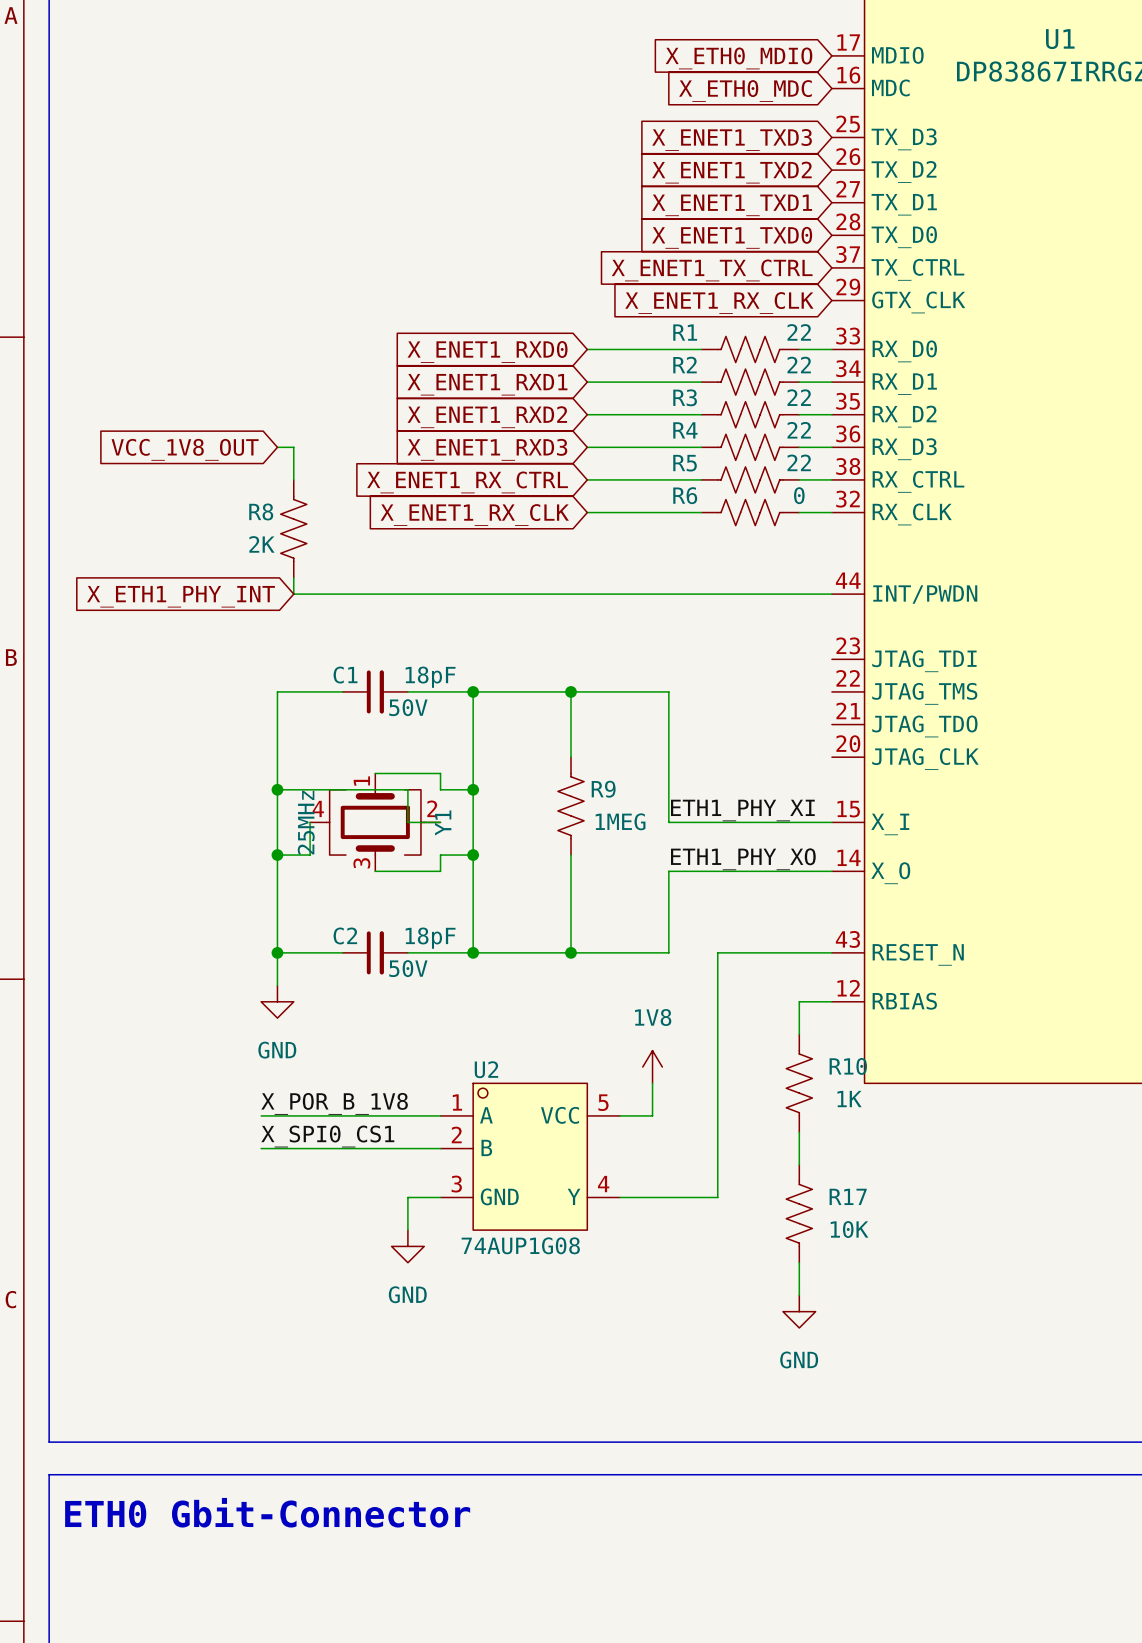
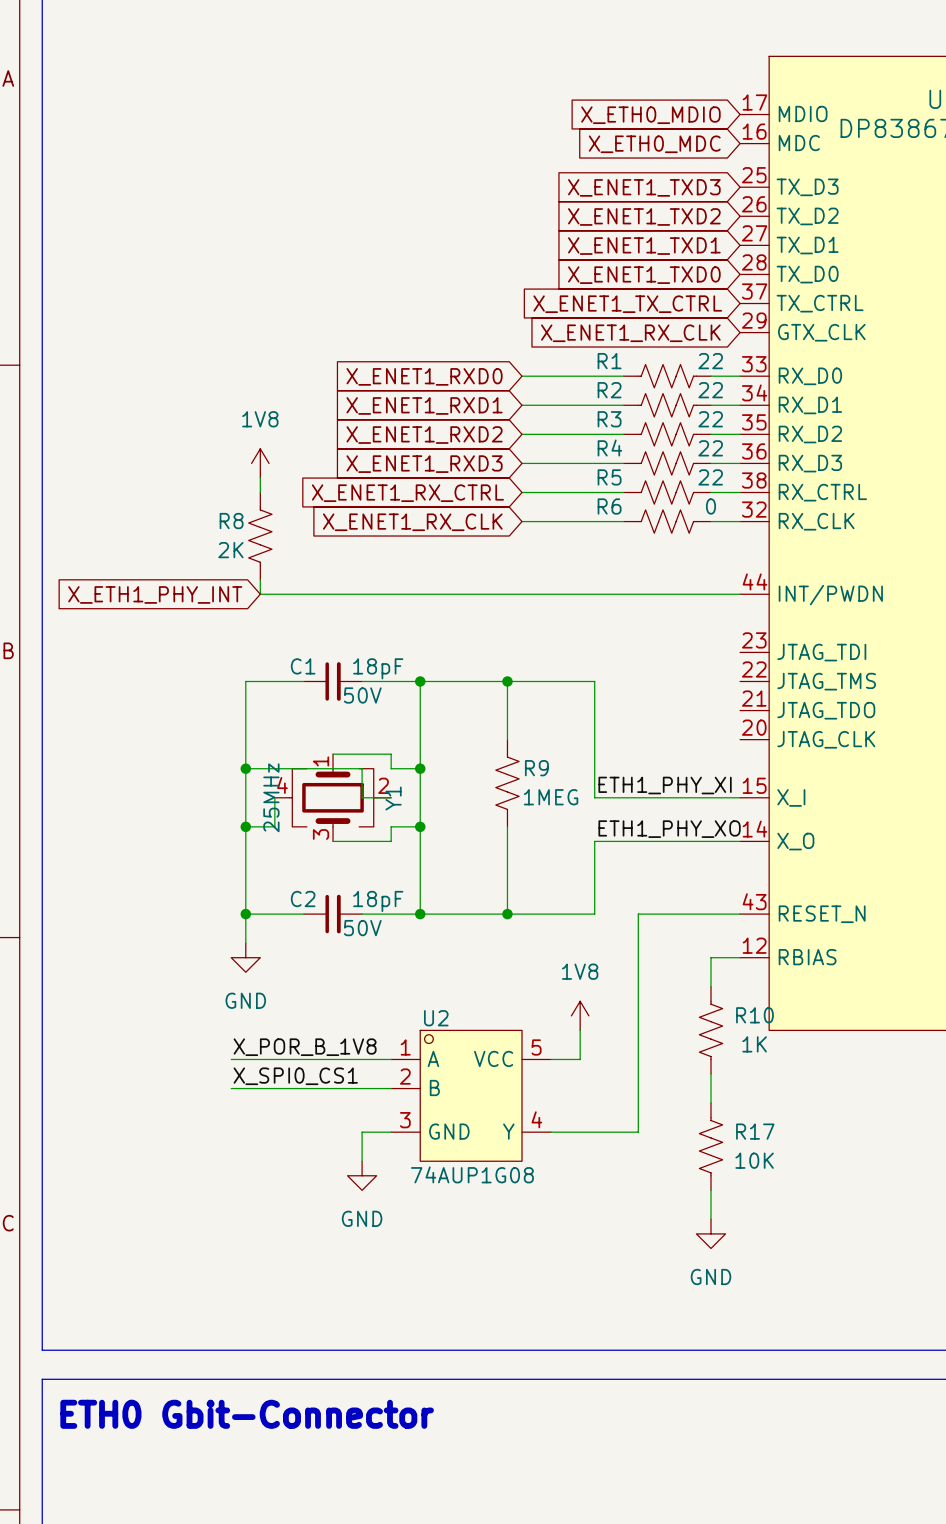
power symbol: none -> 1V8 (260, 463)
global label: VCC_1V8_OUT (185, 449) -> none

